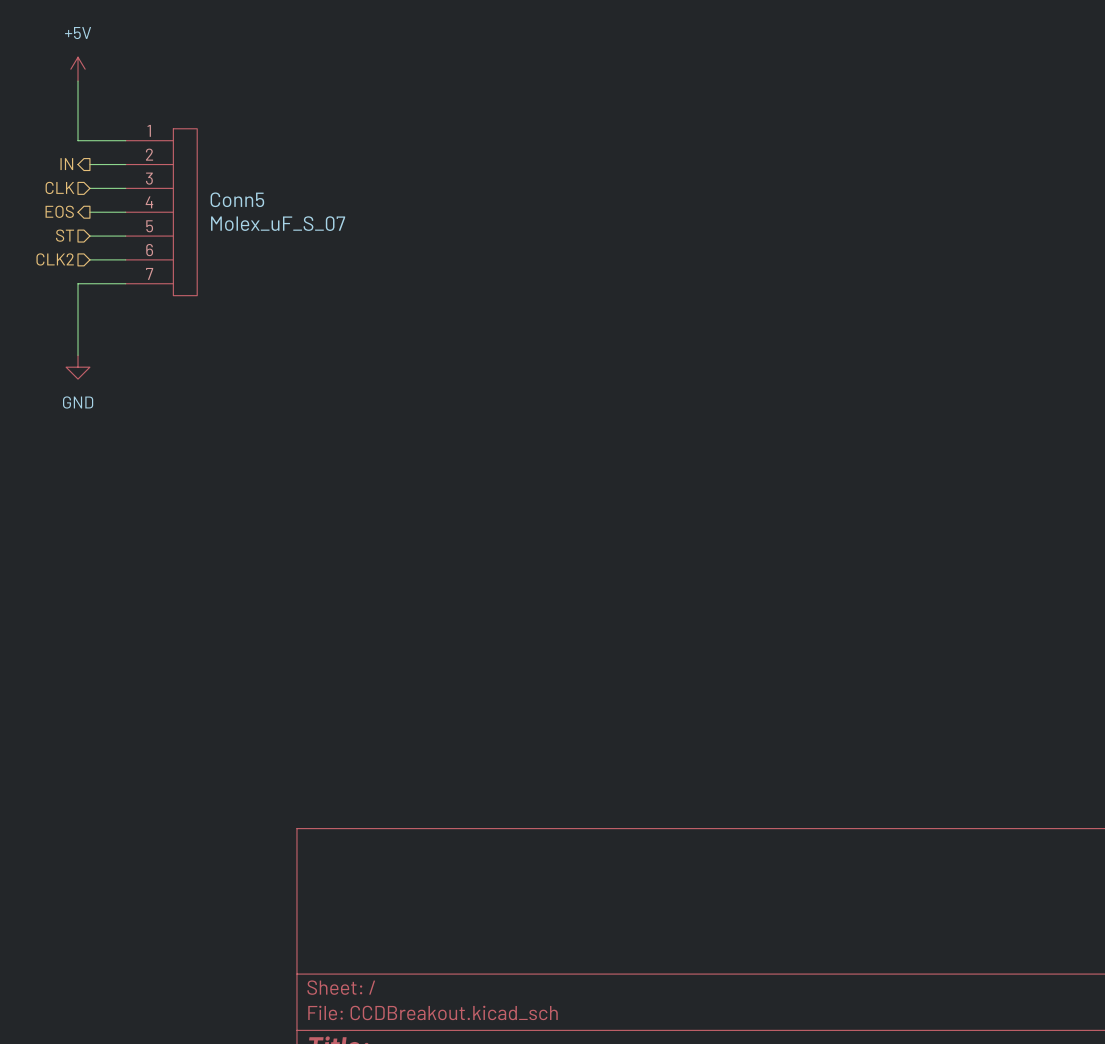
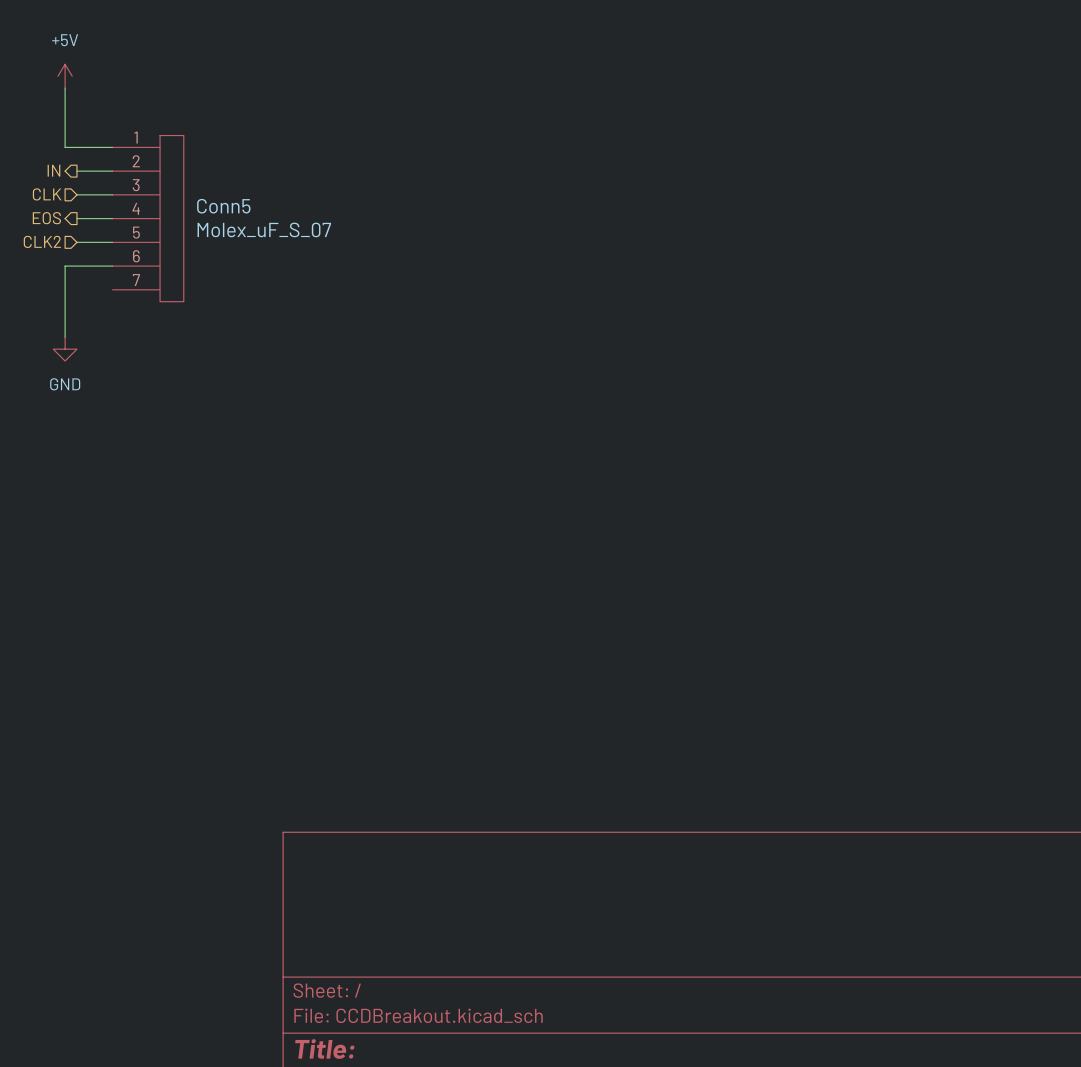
hierarchical label: ST (65, 235) -> CLK2 (42, 241)
hierarchical label: CLK2 (55, 259) -> none
wire: (78, 283) (125, 283) -> (65, 289) (65, 266) (76, 266)
power symbol position: GND (78, 367) -> GND (65, 349)

